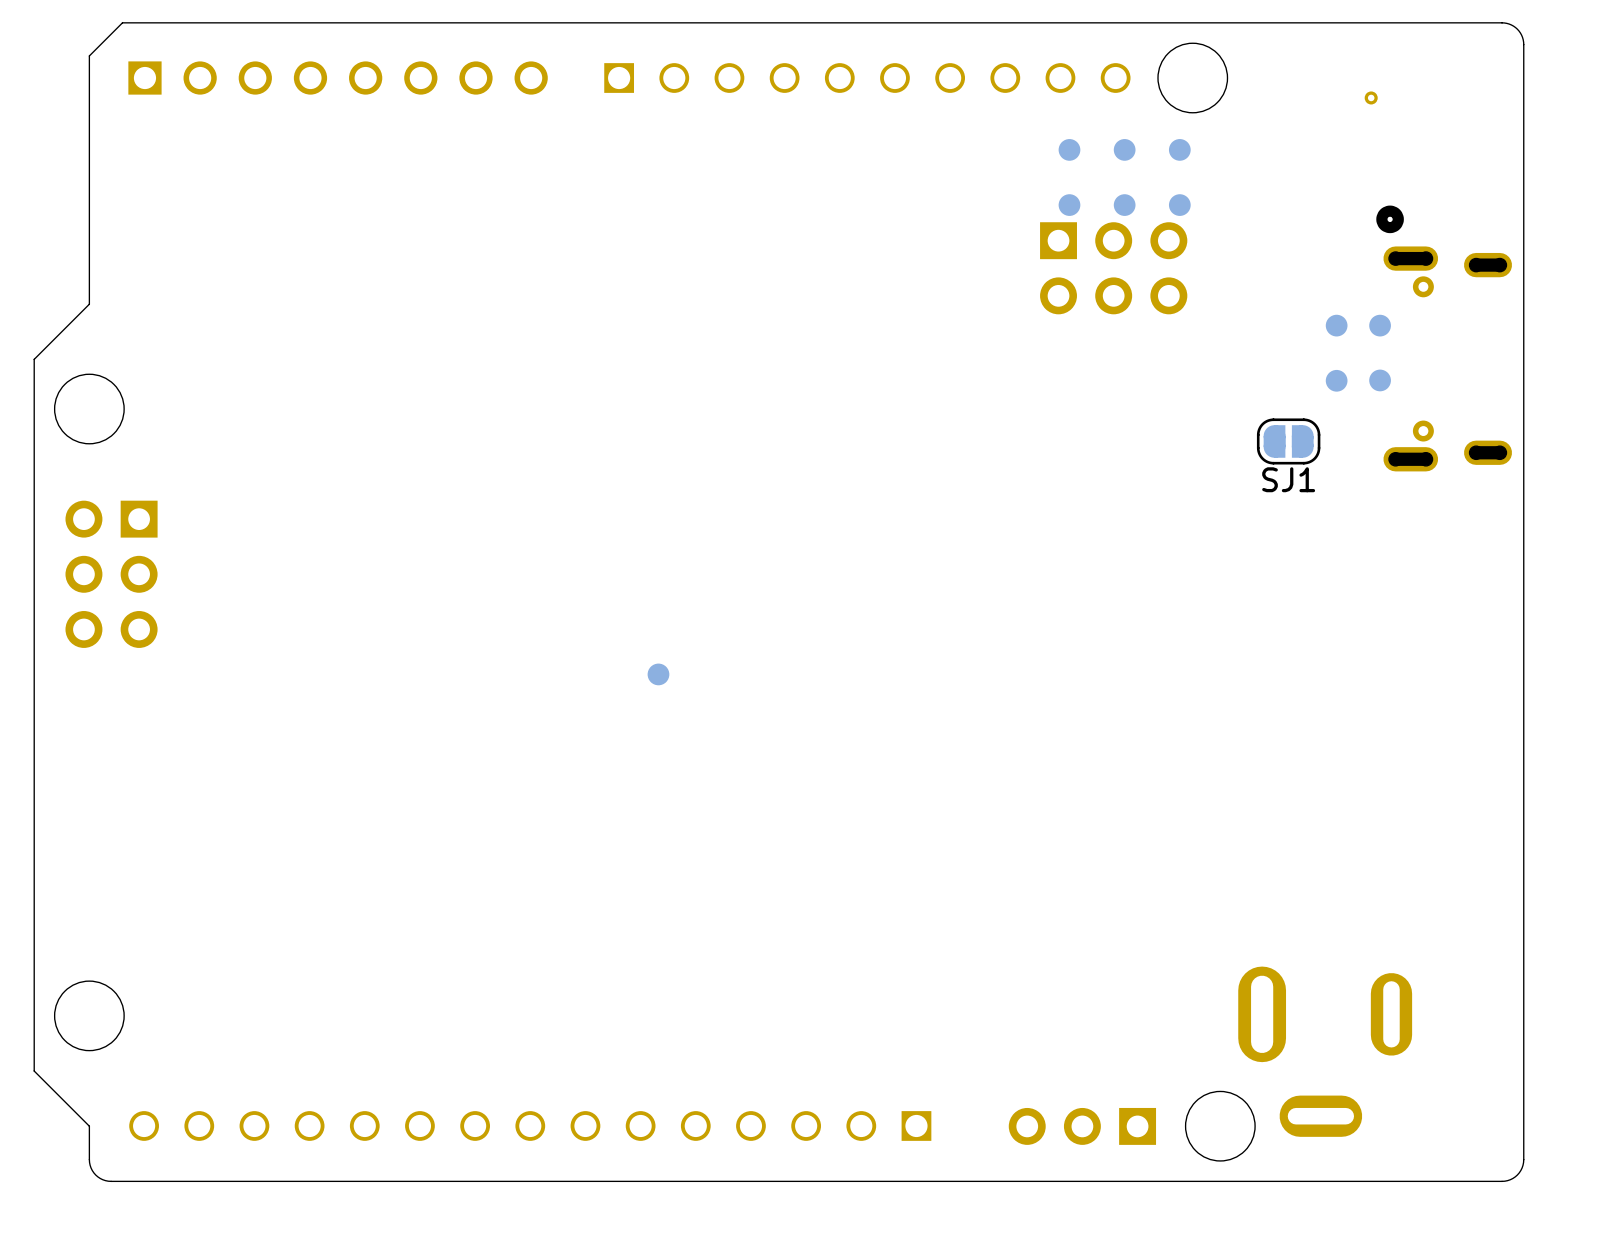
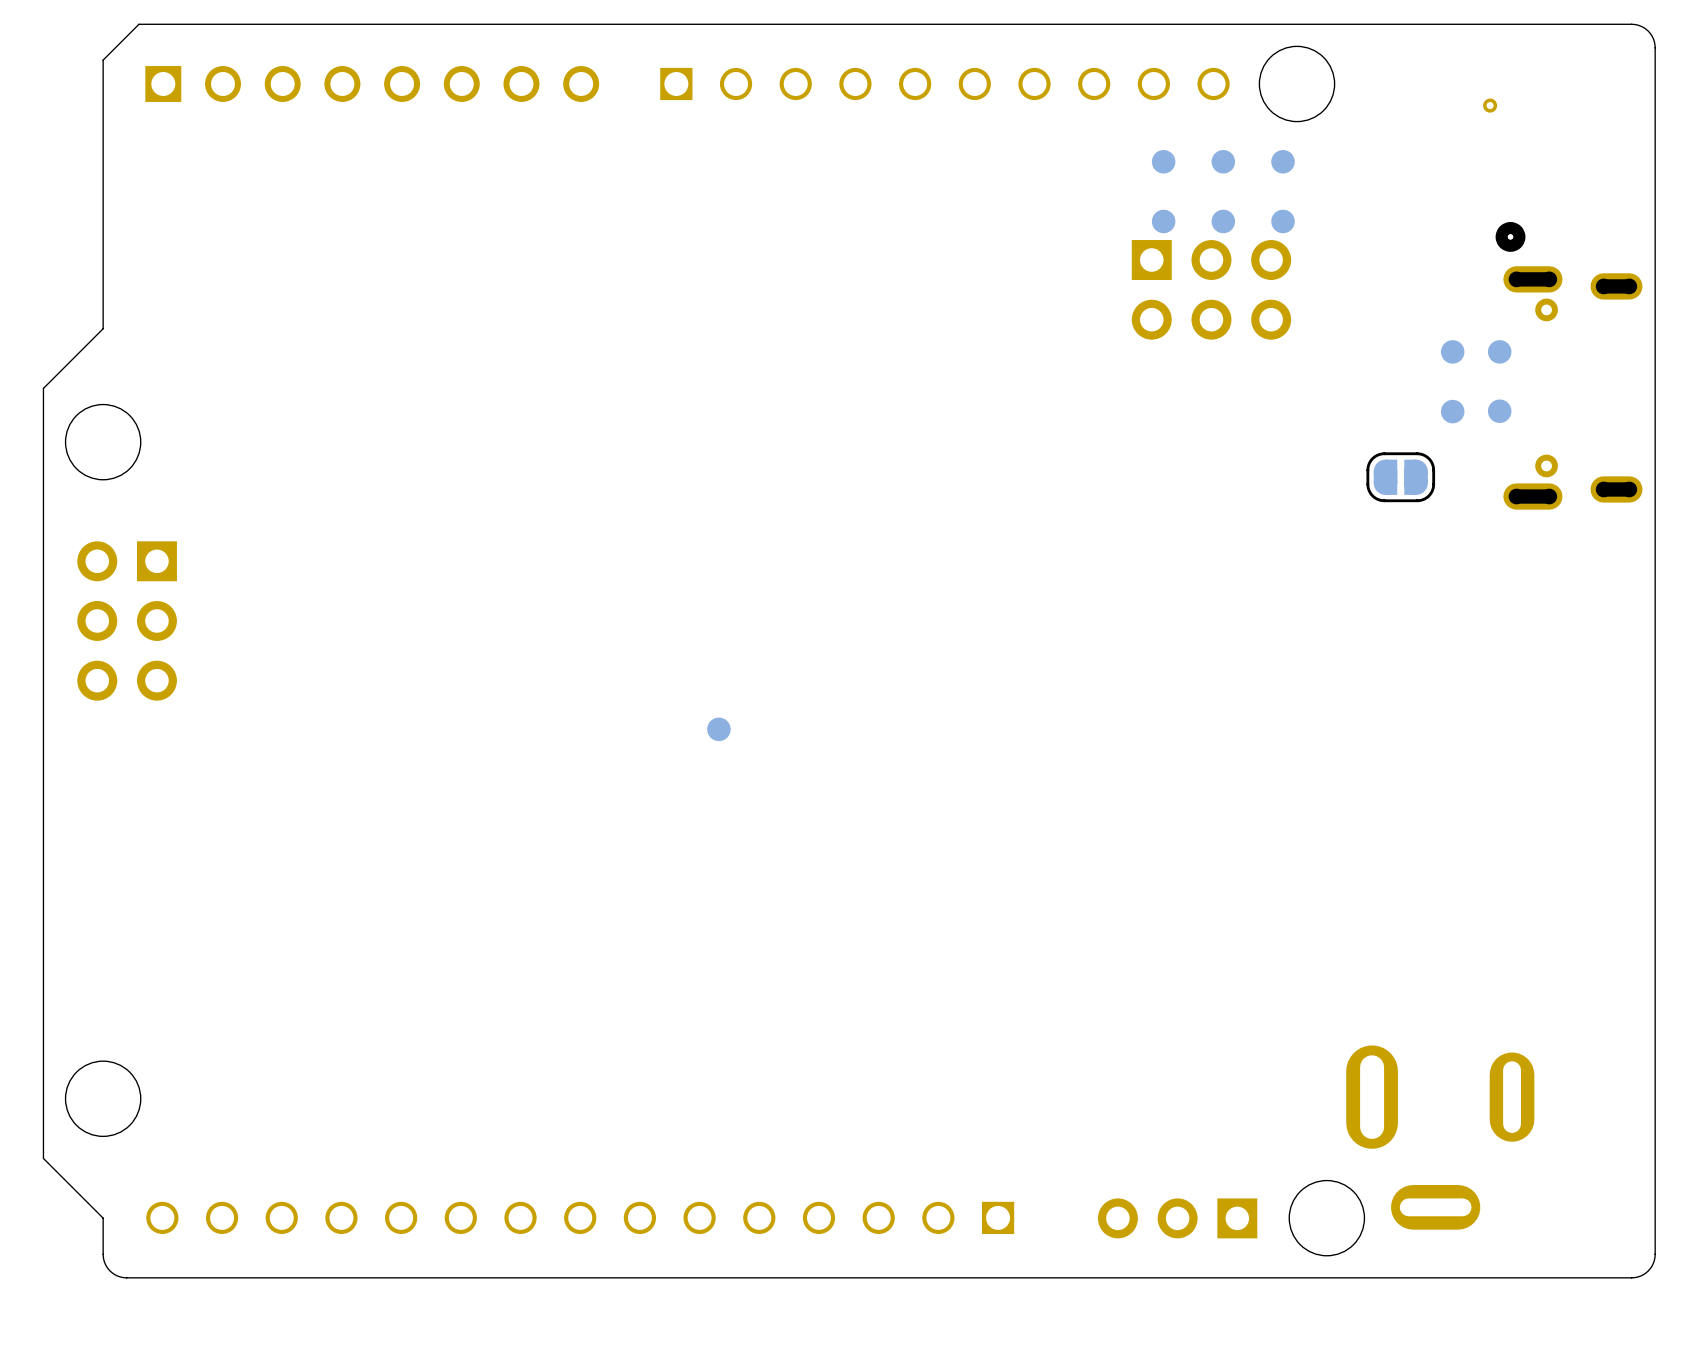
SJ1 name: SJ1 (1288, 479) -> none

